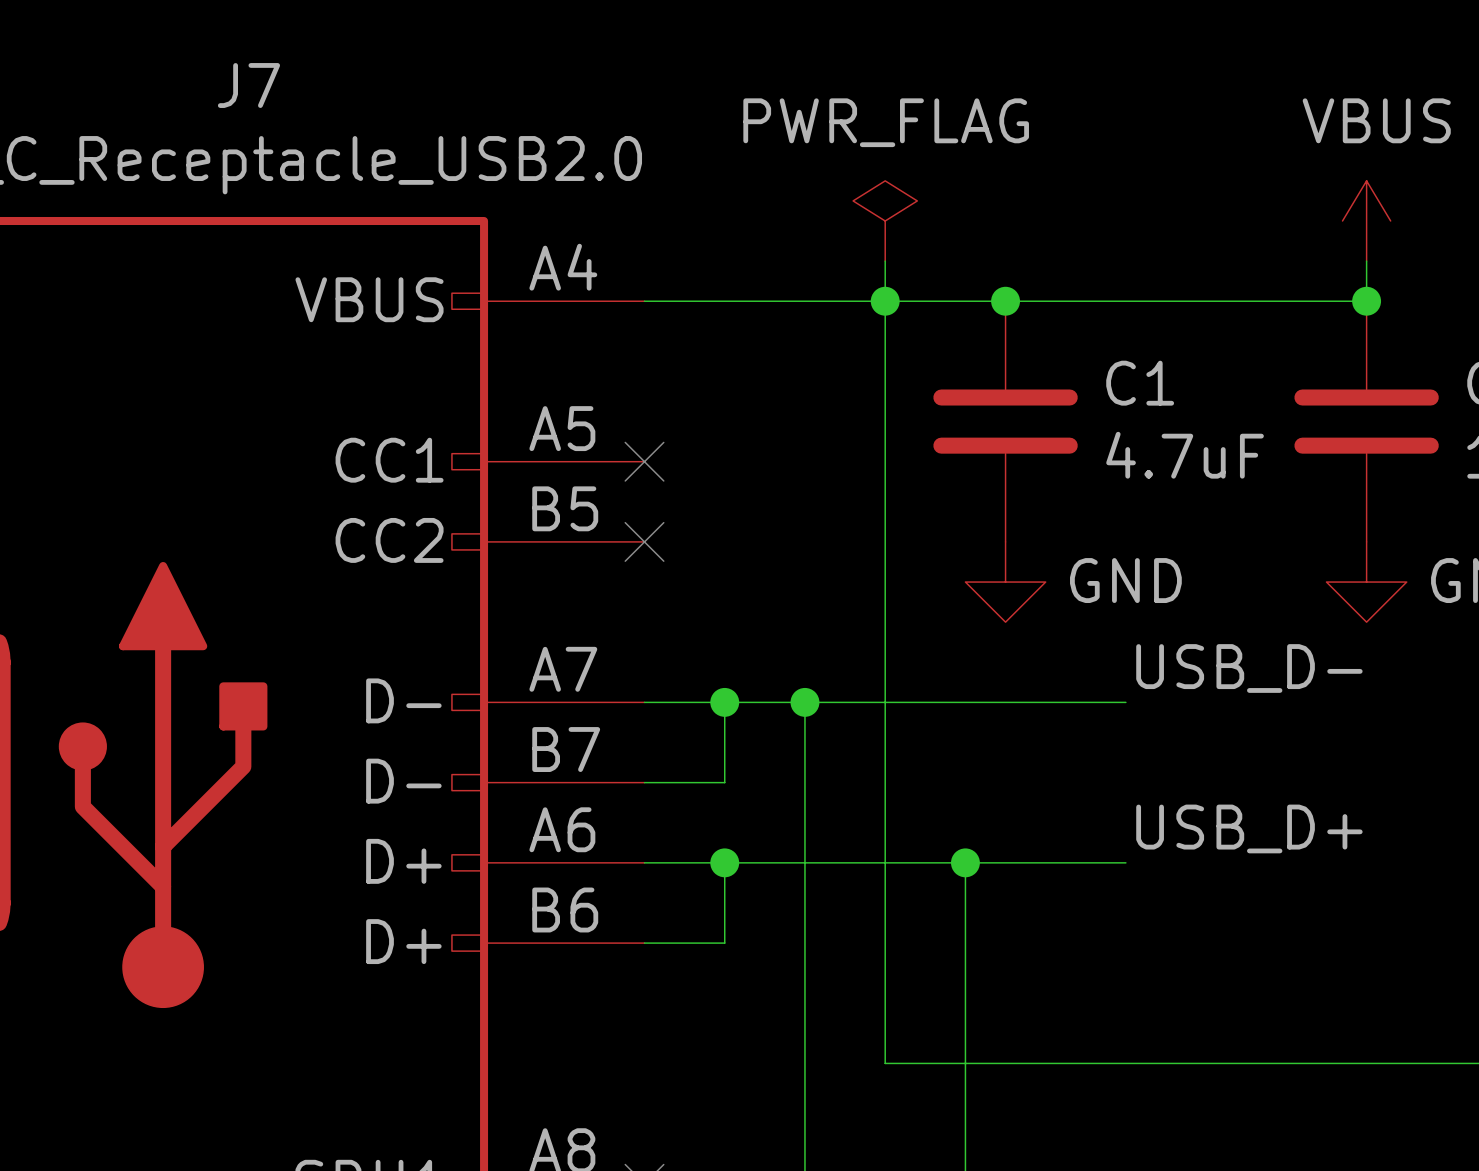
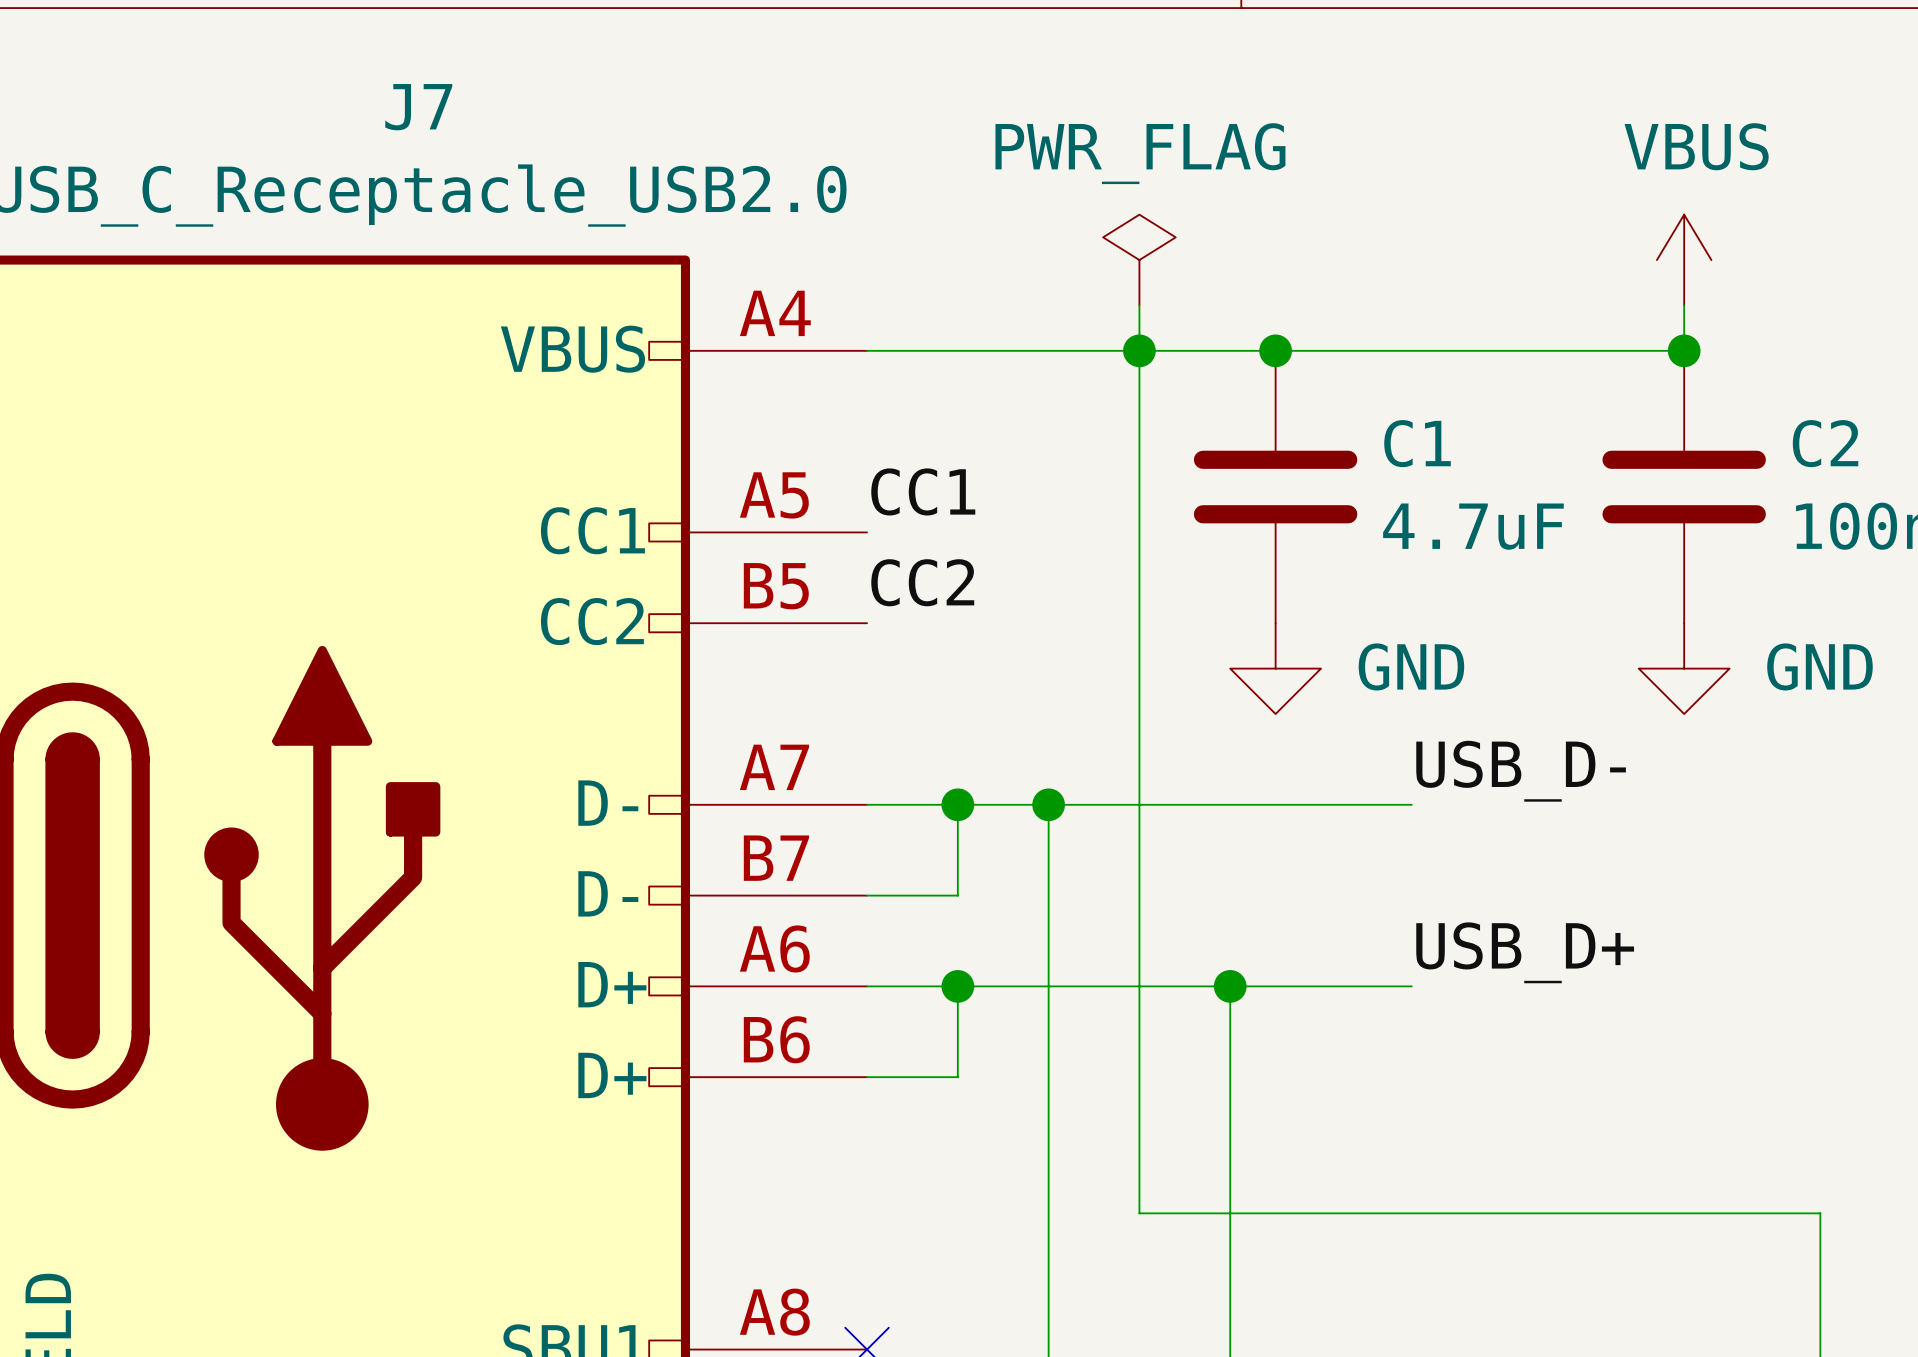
label: none -> CC1 (923, 491)
no-connect mark: (644, 461) -> none
label: none -> CC2 (922, 582)
no-connect mark: (644, 541) -> none

